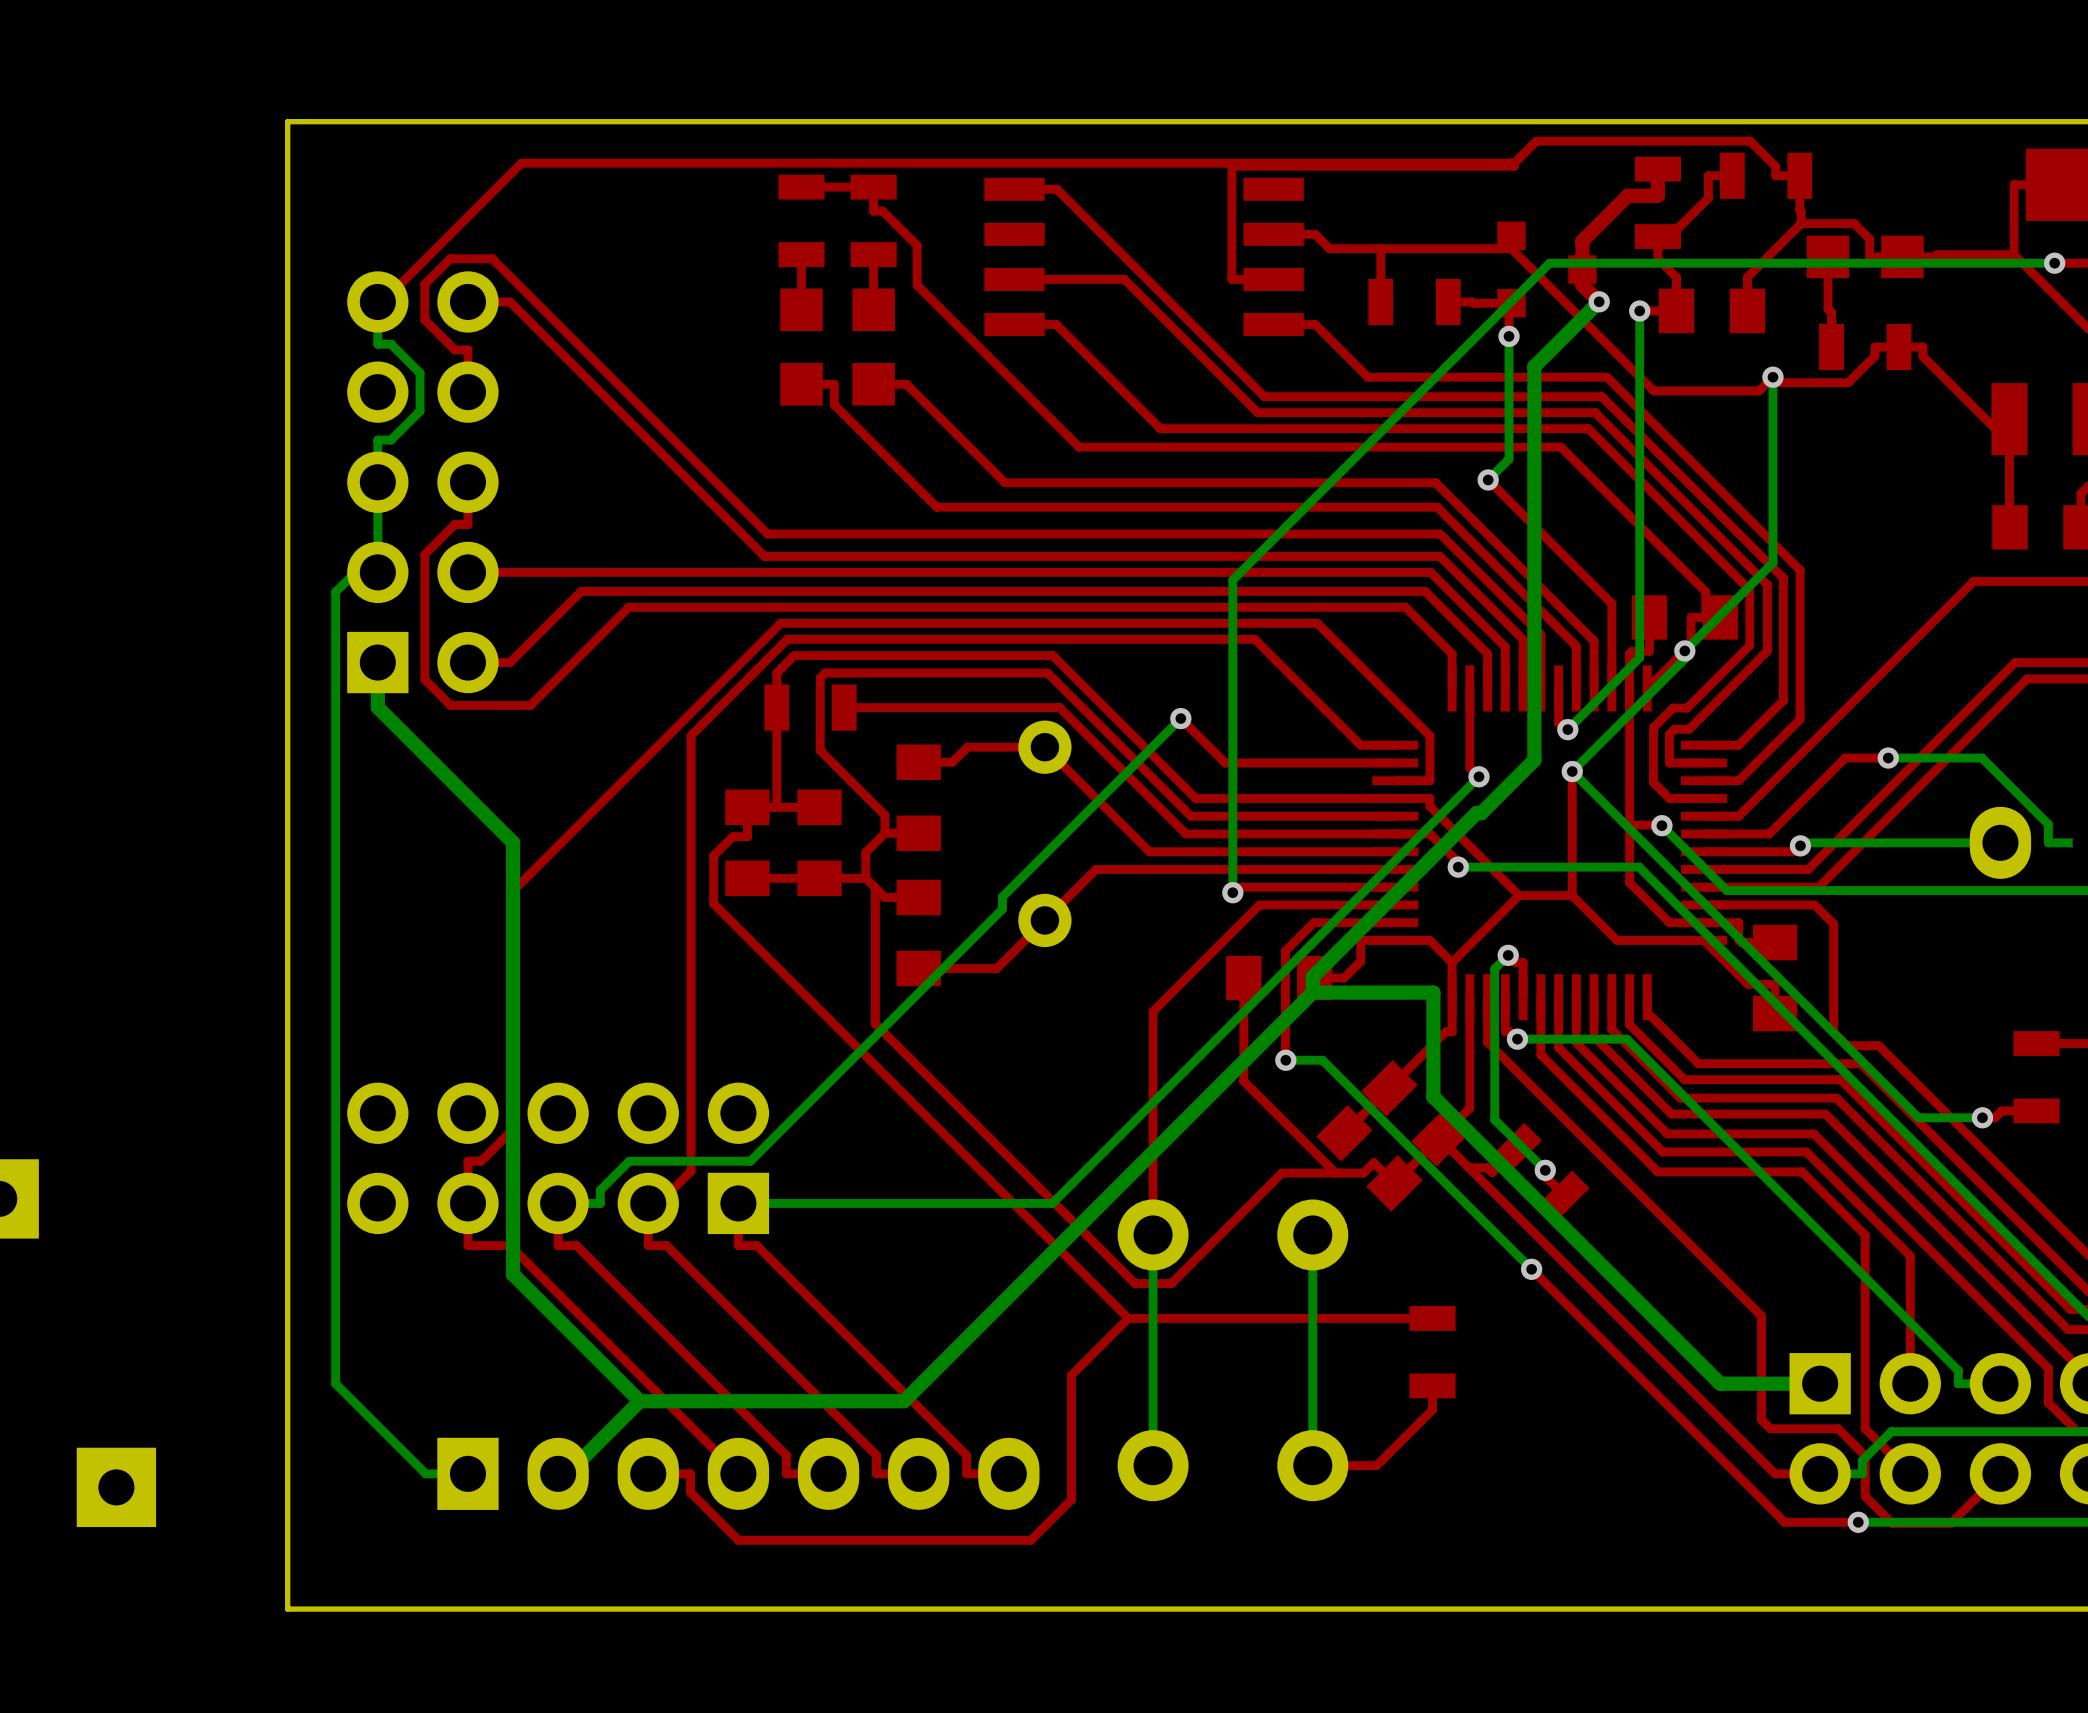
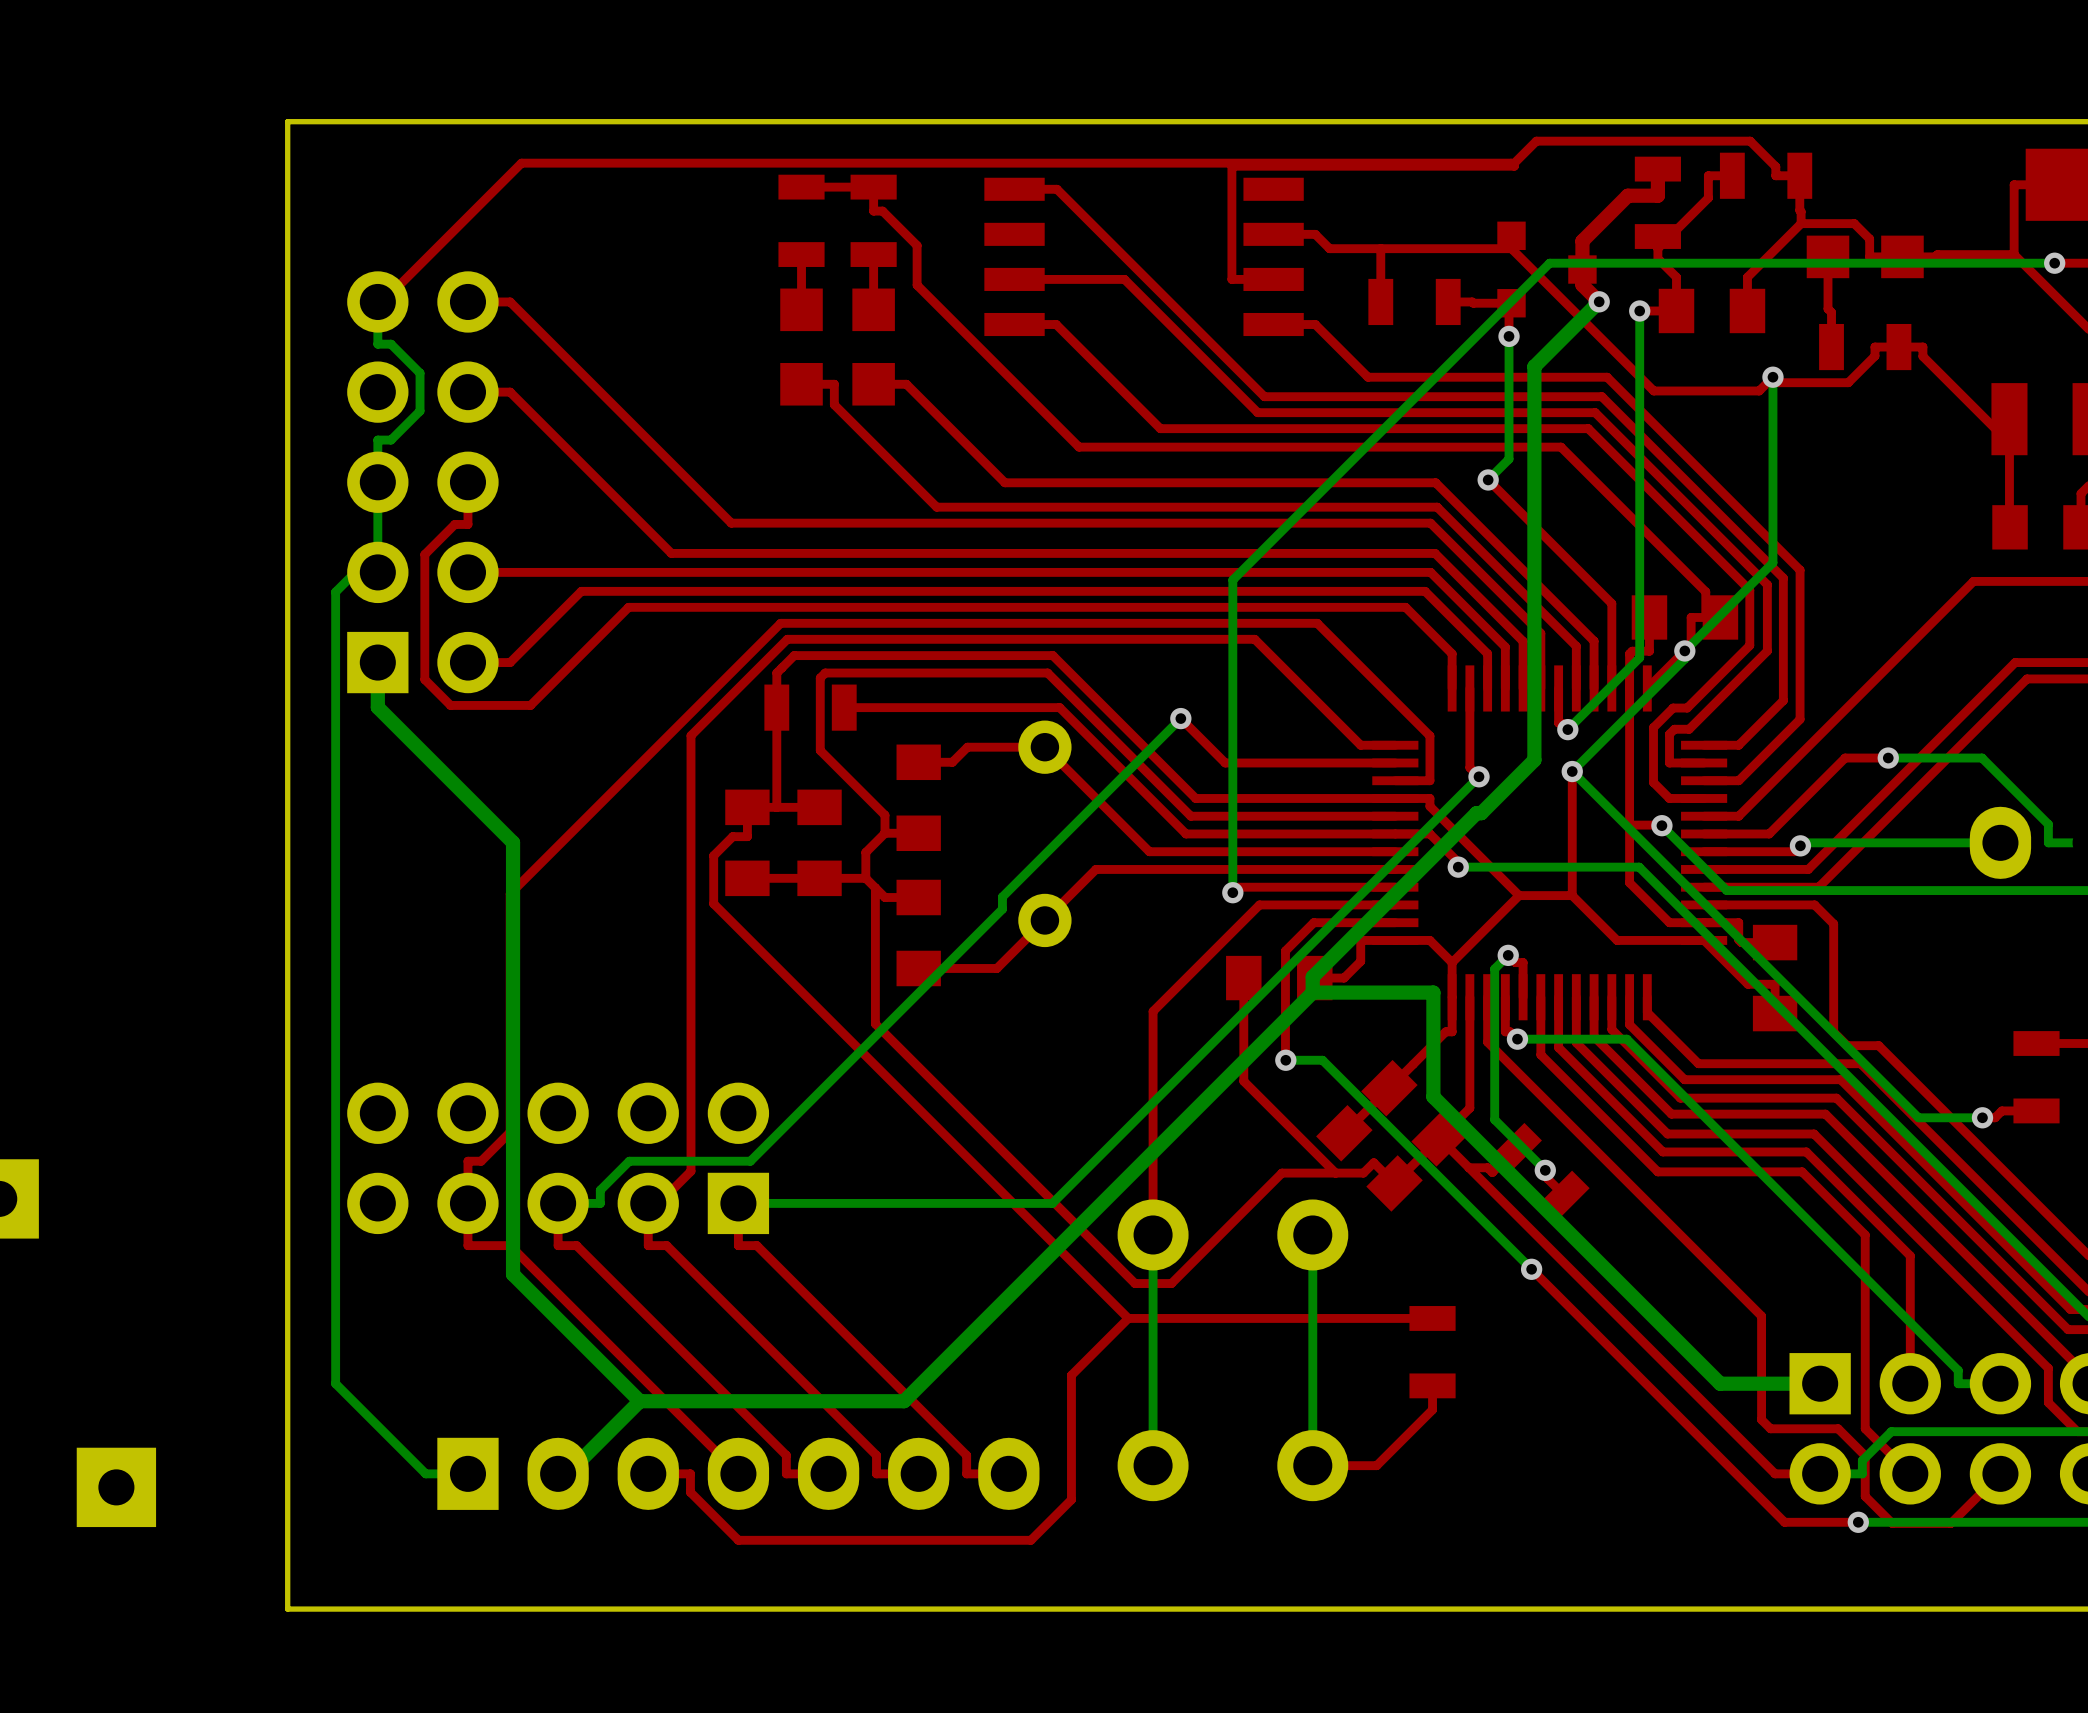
top track: (467, 392) (467, 349) (454, 349) (424, 319) (424, 284) (450, 258) (492, 258) (767, 534) (1440, 534) (1540, 634) -> (467, 392) (510, 392) (671, 553) (1435, 553) (1523, 641)
top track: (731, 523) (764, 556) (1440, 556) (1523, 641) -> (731, 523) (1430, 523) (1540, 634)

